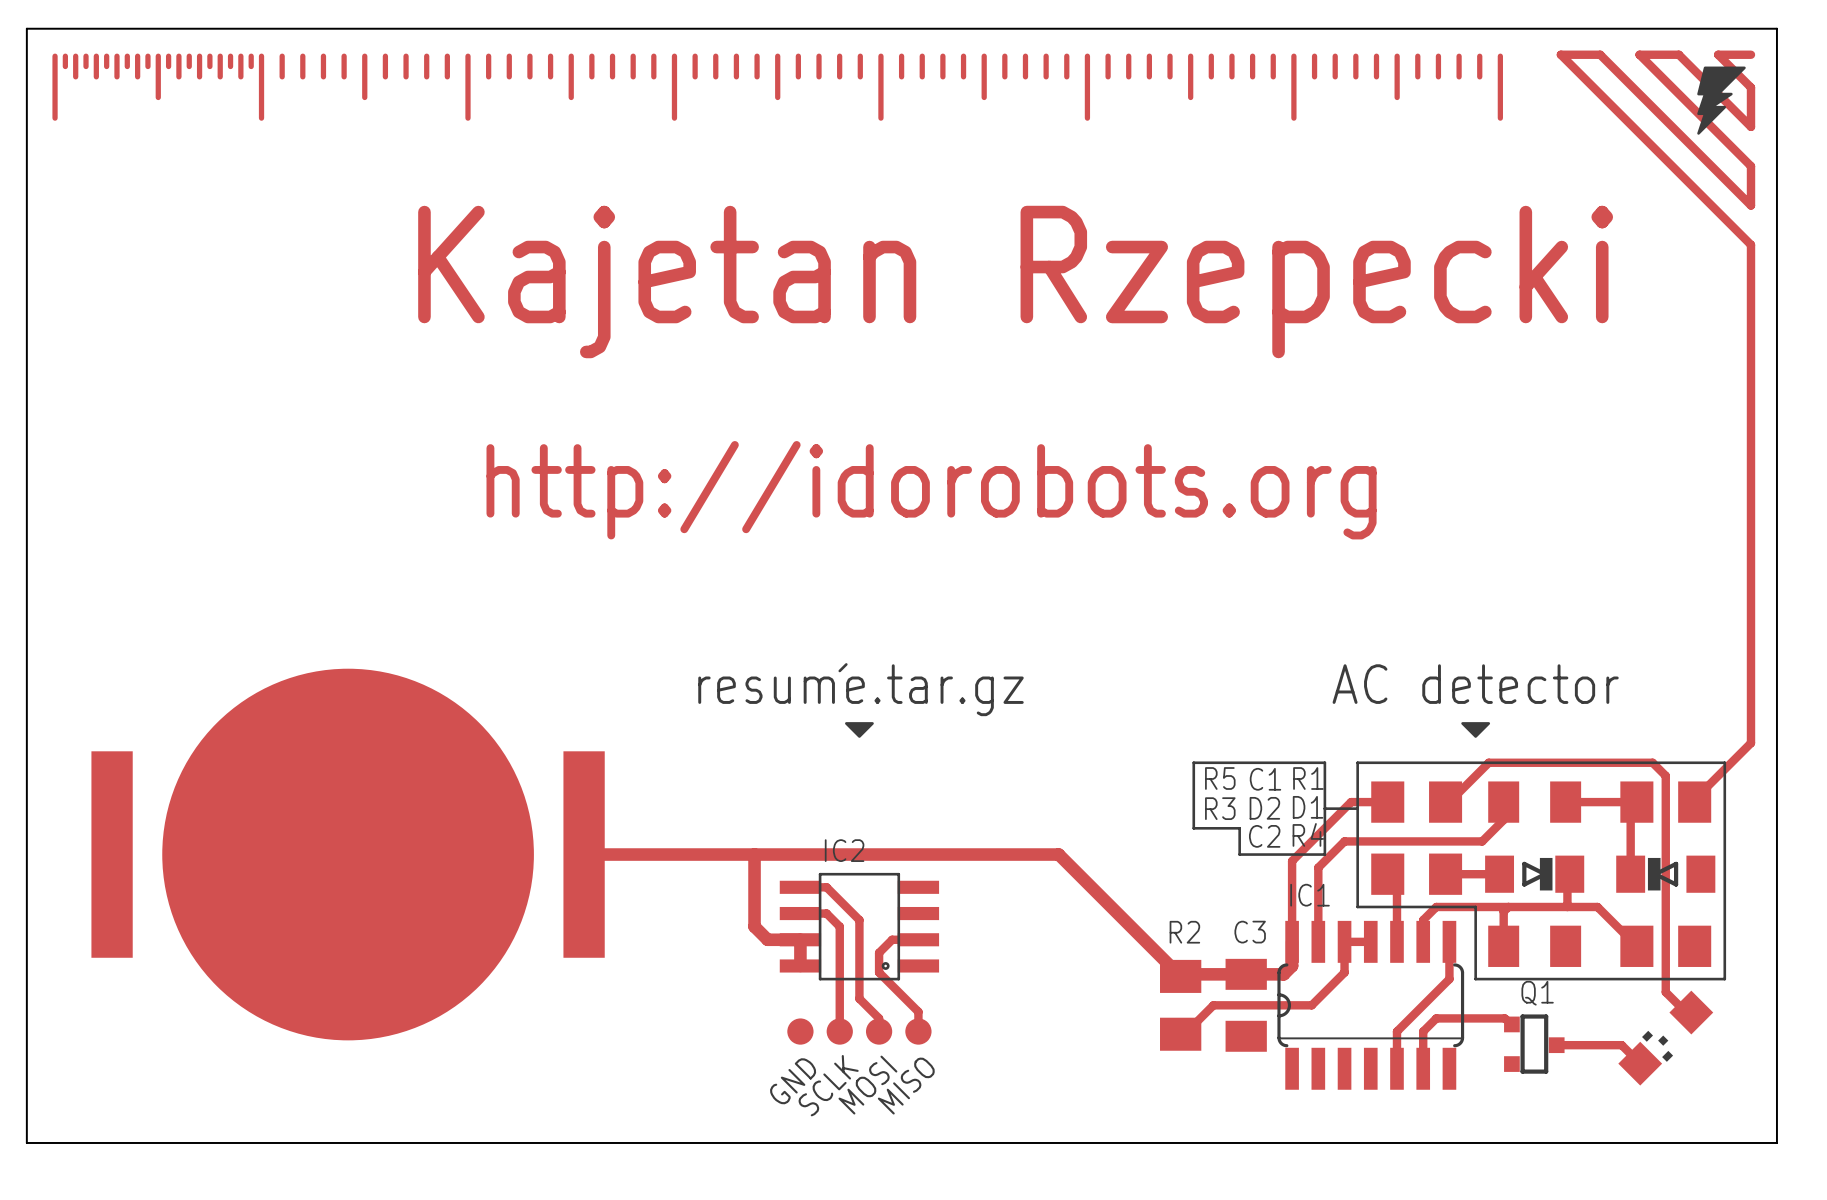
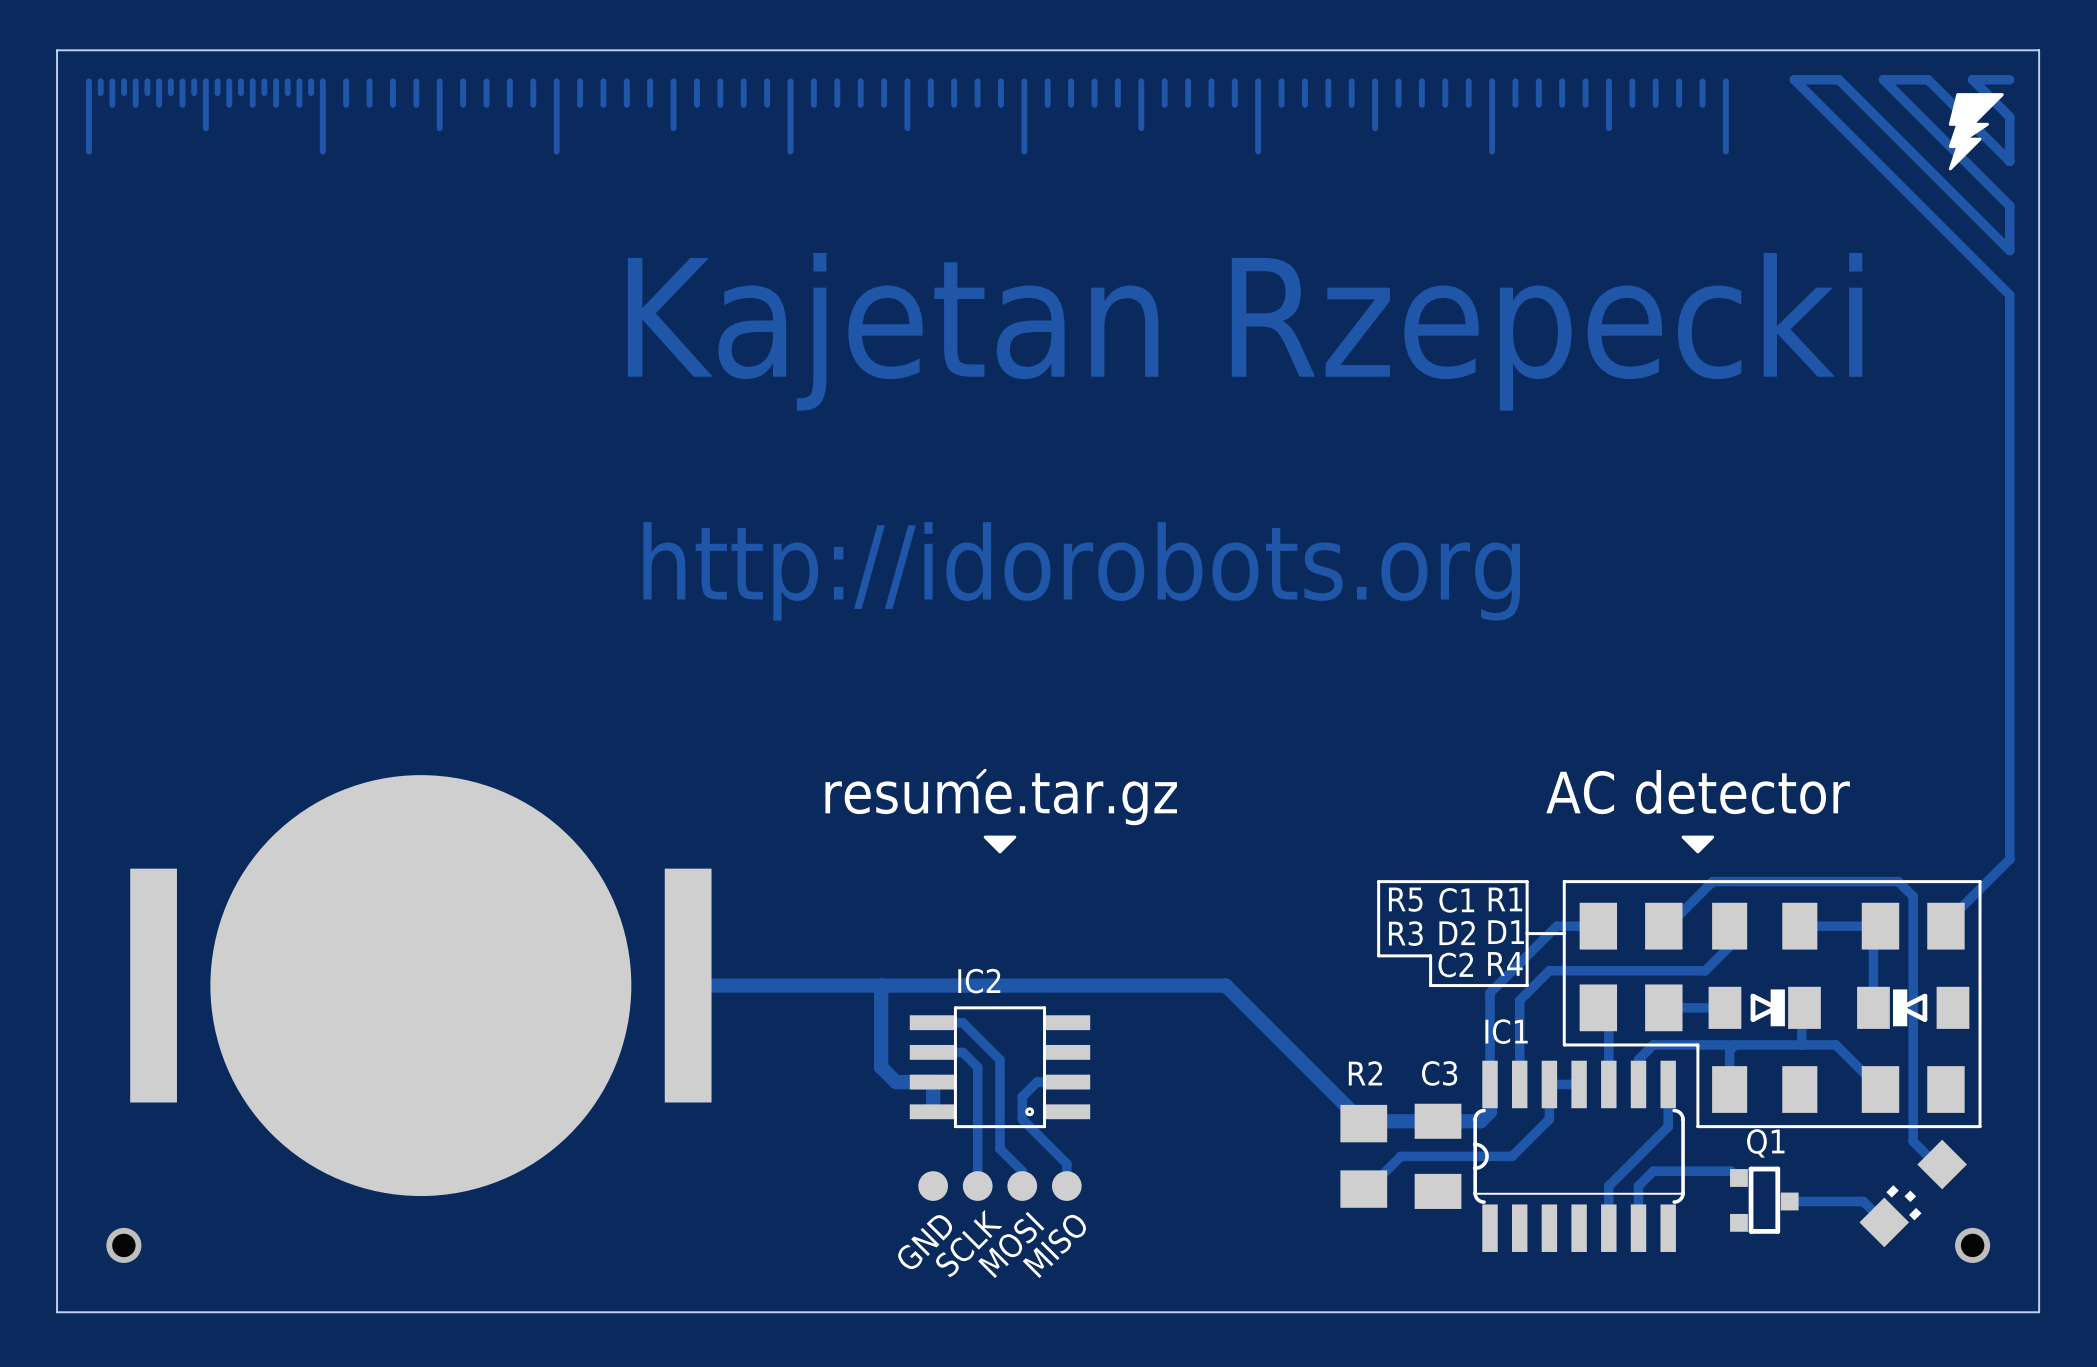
via: none -> (123, 1245)
via: none -> (1972, 1245)

